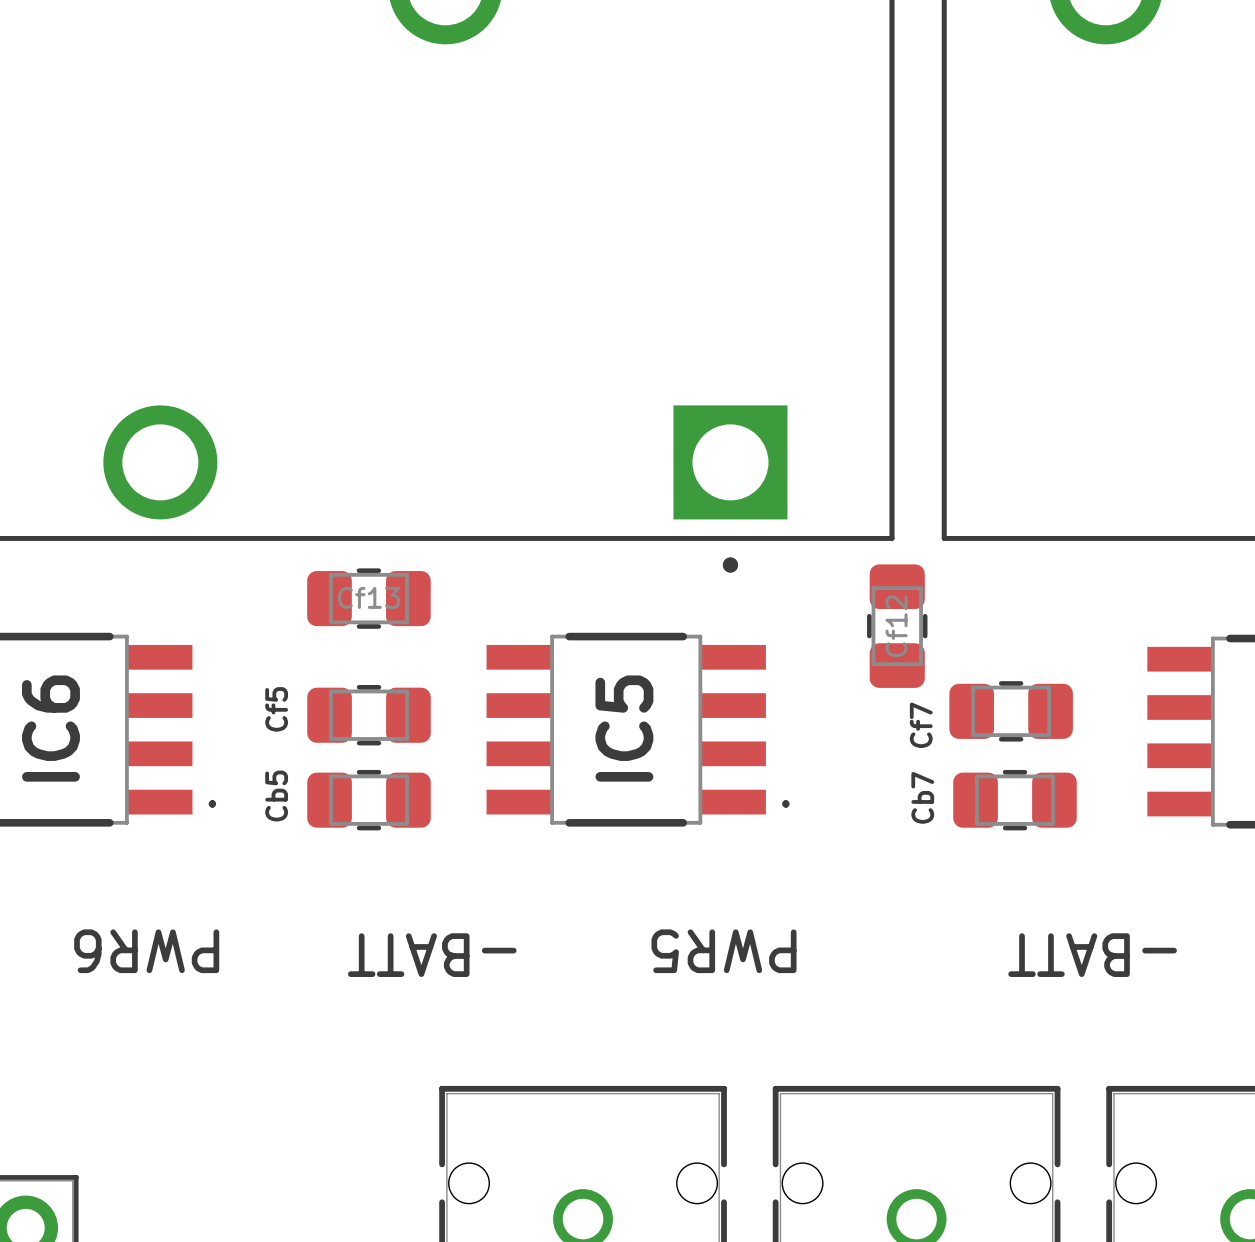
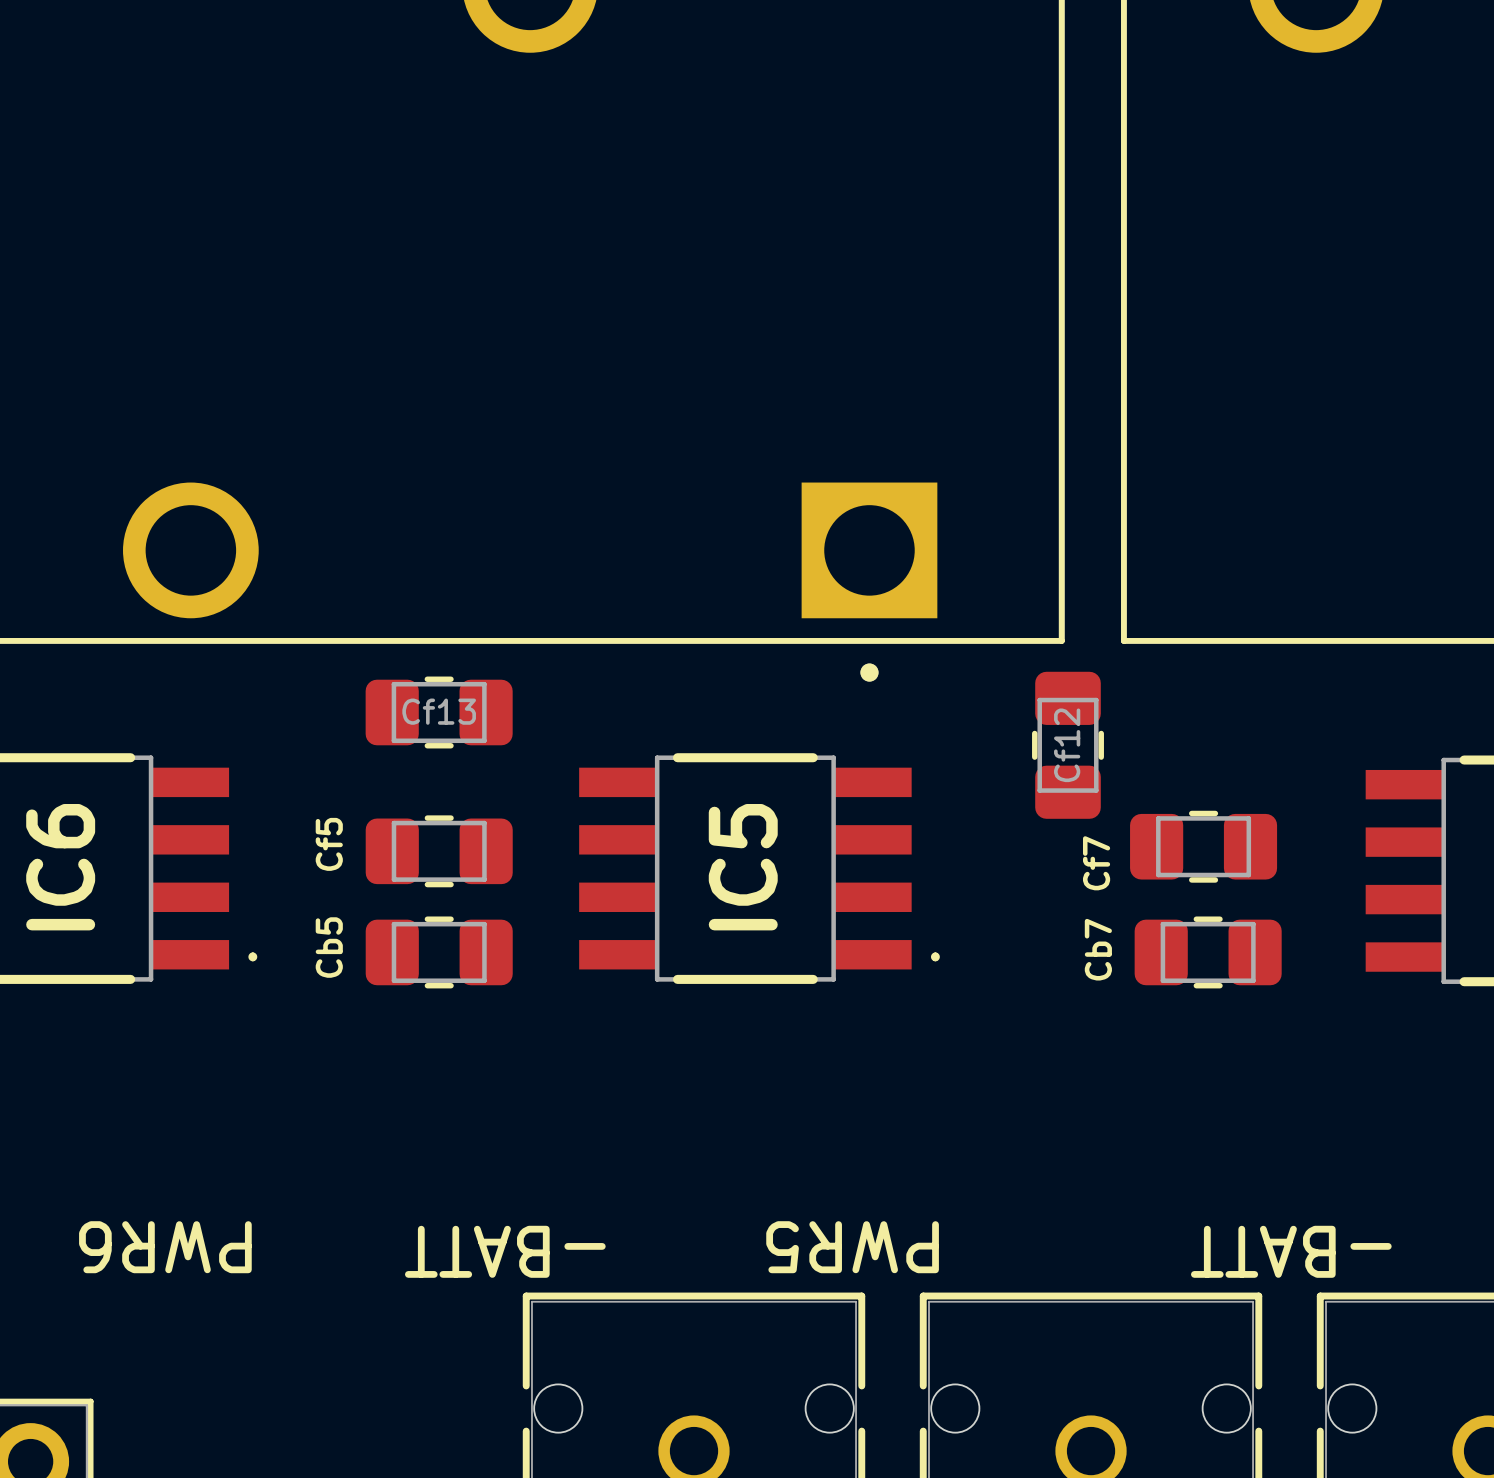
text position: PWR6 (146, 951) -> PWR6 (165, 1247)
text position: PWR5 (723, 951) -> PWR5 (852, 1247)
text position: -BATT (432, 955) -> -BATT (505, 1251)
text position: -BATT (1092, 955) -> -BATT (1291, 1251)

